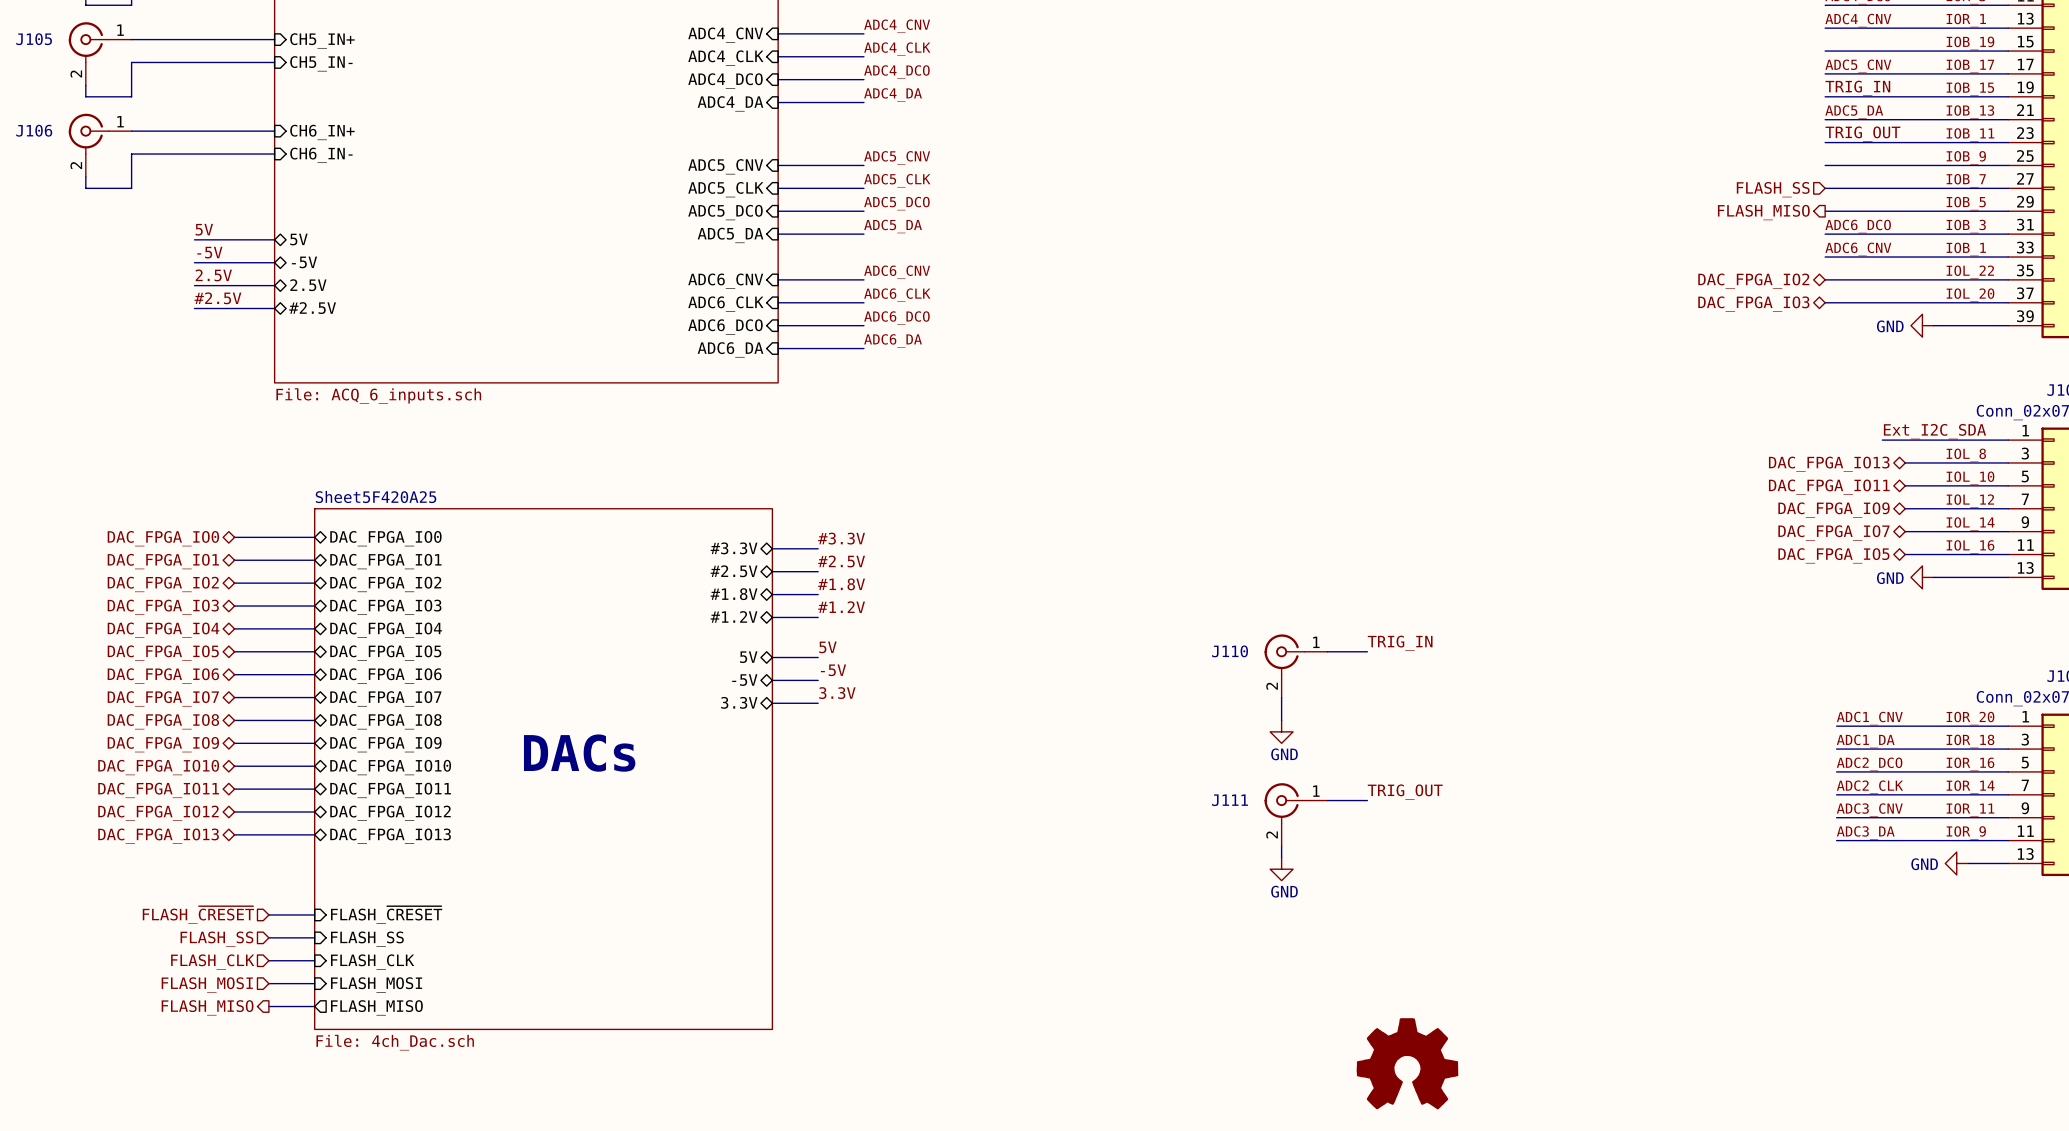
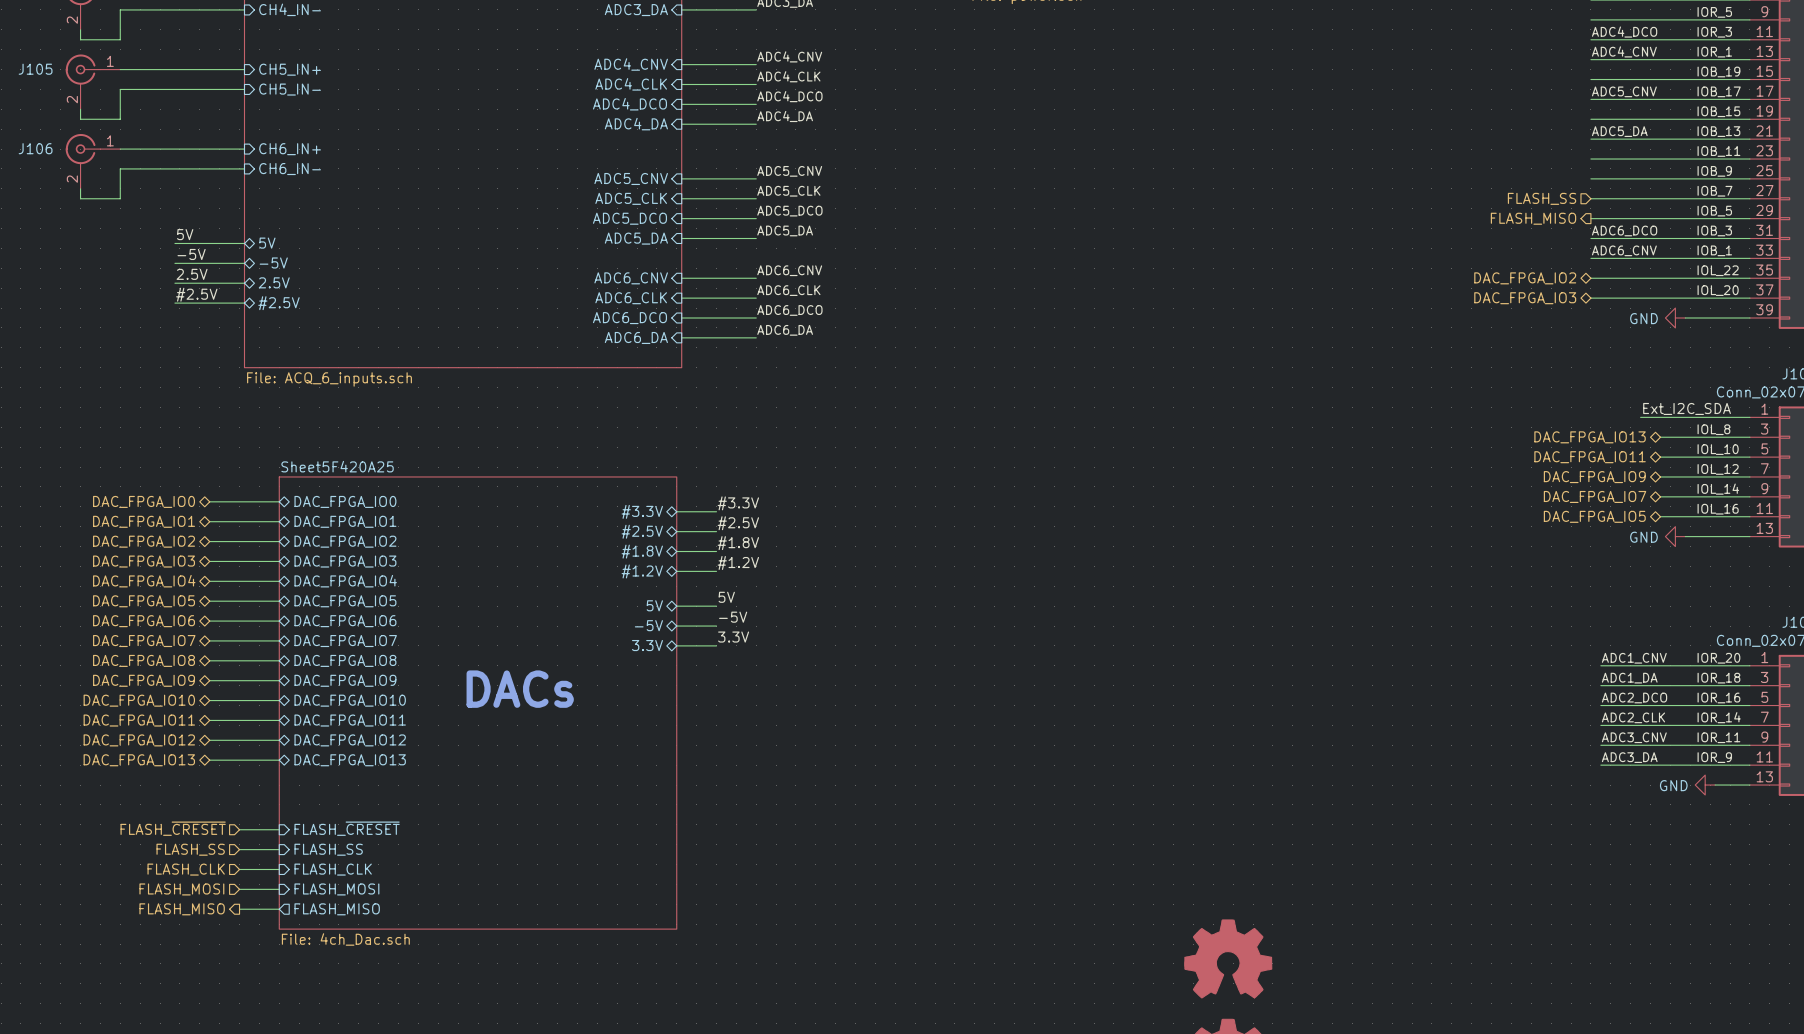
label: TRIG_IN (1857, 88) -> none
label: TRIG_OUT (1862, 134) -> none
label: TRIG_IN (1400, 643) -> none
wire: (1327, 651) (1367, 651) -> none
J110: (1295, 665) -> none
wire: (1281, 697) (1281, 720) -> none
power symbol: GND (1281, 731) -> none
label: TRIG_OUT (1405, 792) -> none
wire: (1327, 800) (1367, 800) -> none
J111: (1295, 814) -> none
wire: (1281, 846) (1281, 857) -> none
power symbol: GND (1281, 869) -> none

